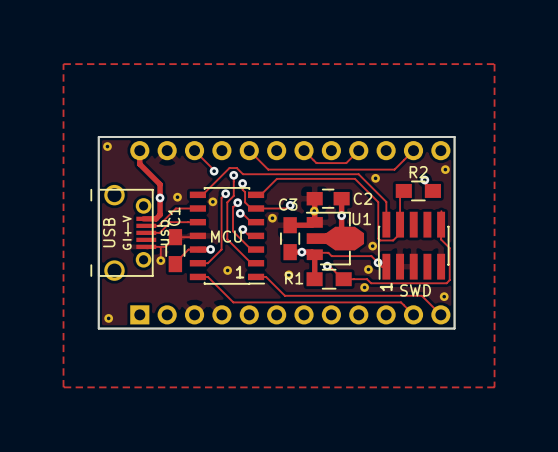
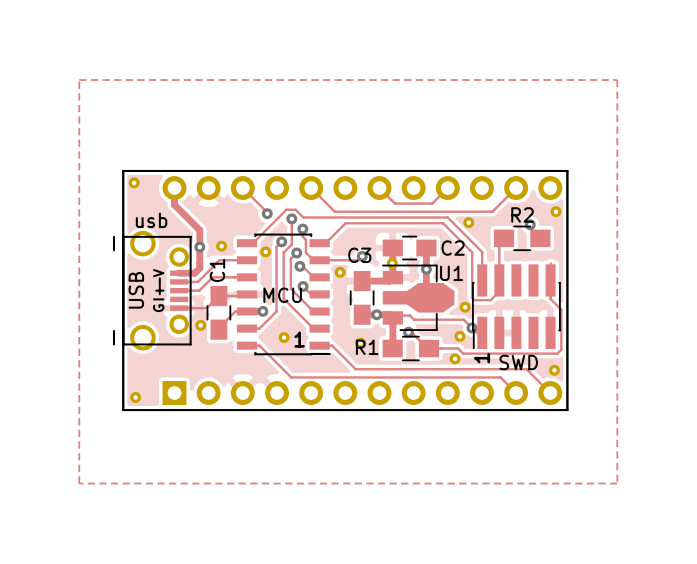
USB footprint: [90, 184, 157, 281] -> [112, 230, 192, 351]
USB value rotation: 0° (163, 232) -> 90° clockwise (151, 220)
USB value position: usb (163, 232) -> usb (151, 220)
track: (160, 246) (160, 260) -> none

